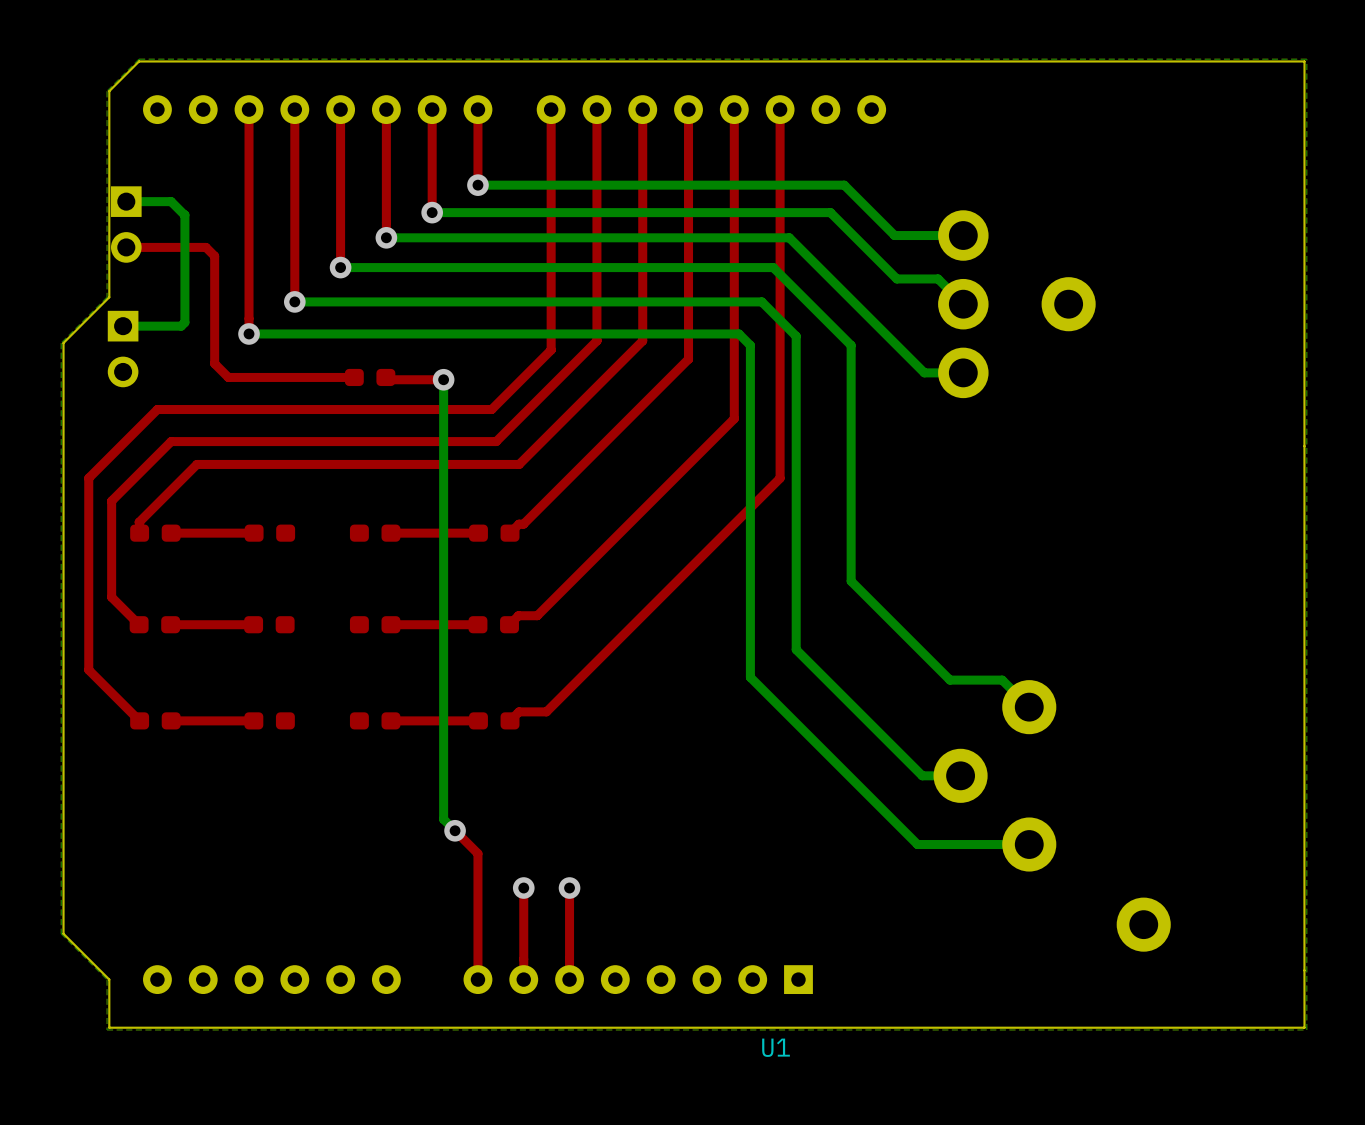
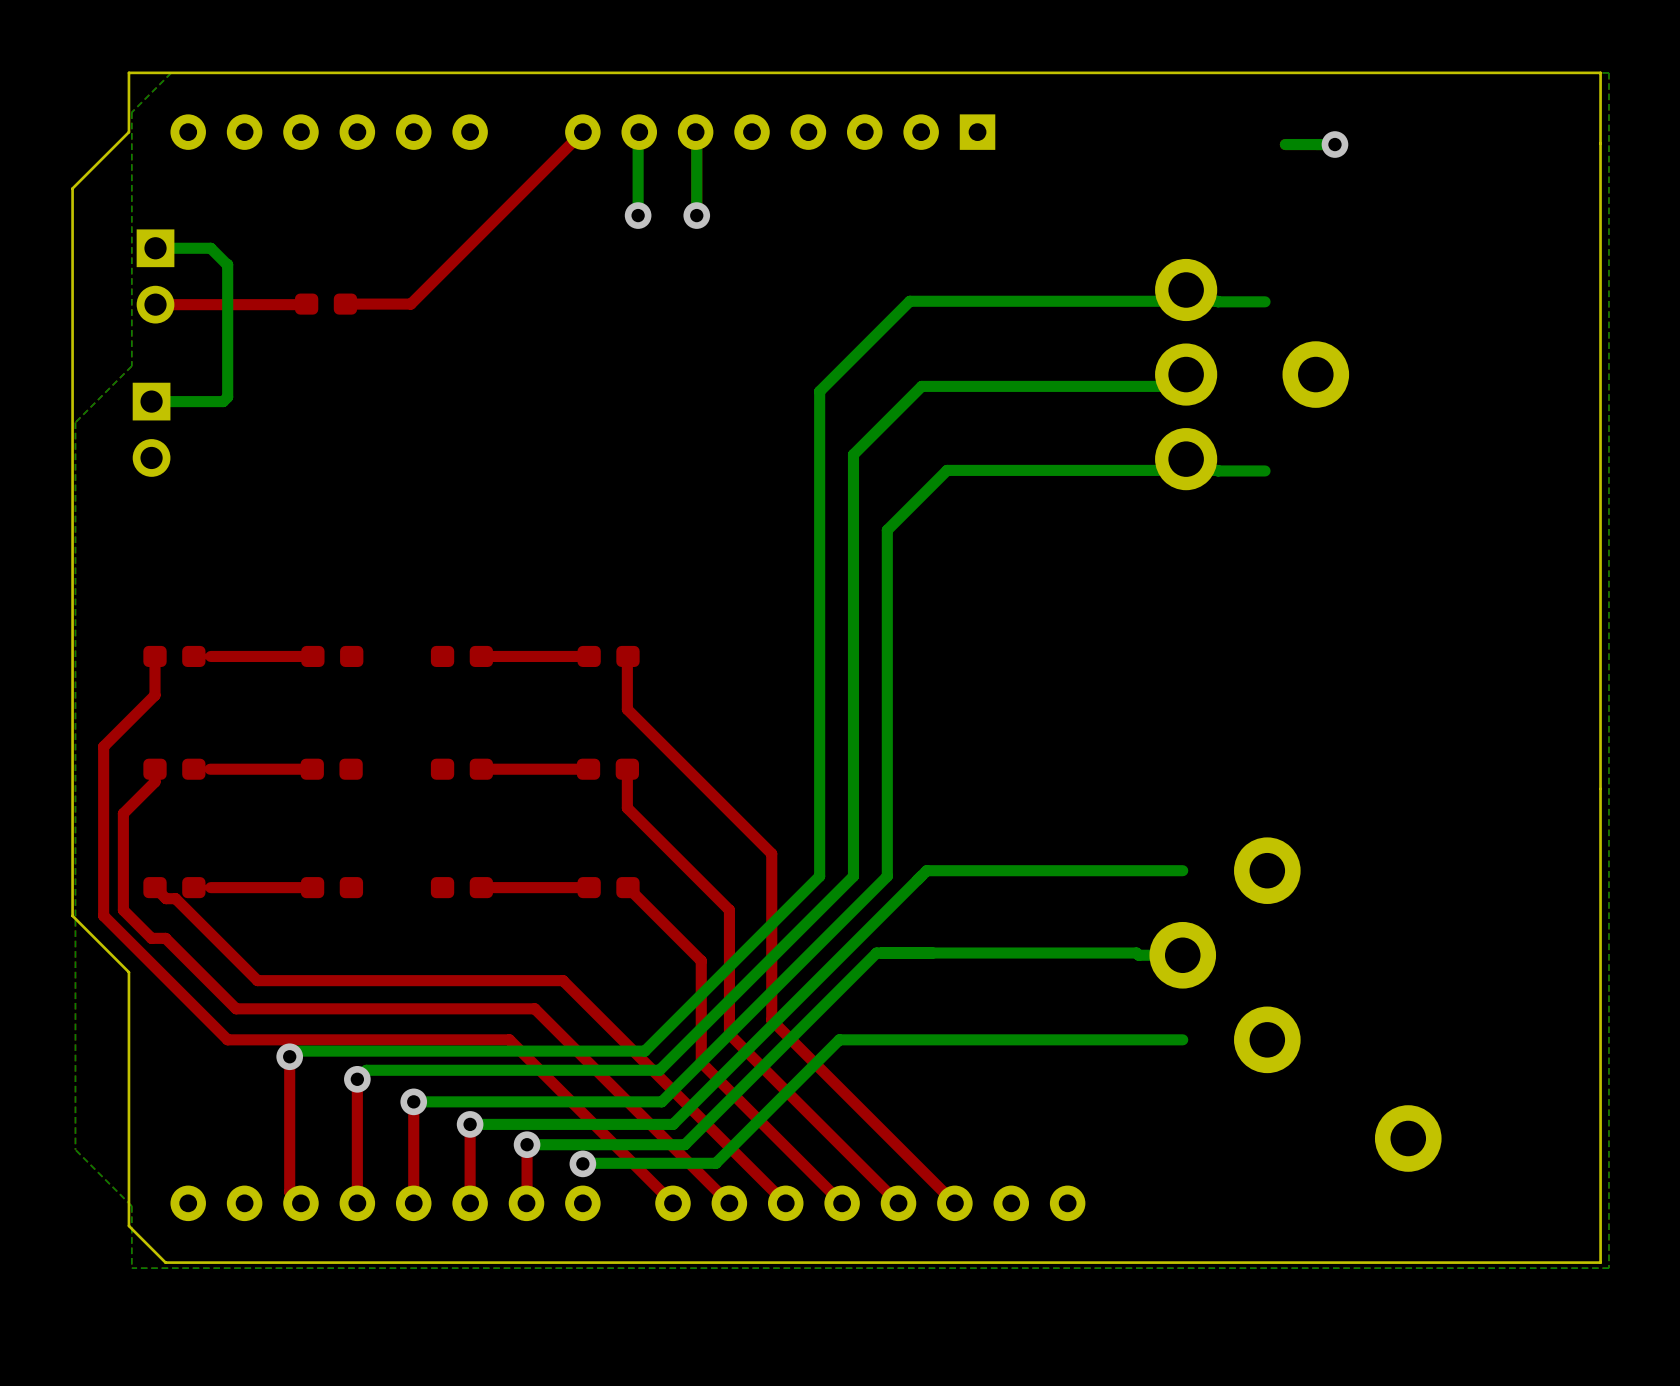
top track: none -> (582, 132) (410, 304) (345, 304)
bottom track: none -> (639, 132) (638, 215)
bottom track: none -> (695, 132) (696, 215)
top track: (249, 109) (249, 333) -> none
top track: (294, 109) (294, 301) -> none
top track: (340, 109) (340, 267) -> none
top track: (386, 109) (386, 237) -> none
top track: (432, 109) (432, 212) -> none
top track: (477, 109) (477, 185) -> none
top track: (551, 109) (551, 349) (491, 409) (157, 409) (88, 478) (88, 670) (139, 720) -> none
top track: (596, 109) (596, 340) (496, 441) (171, 441) (111, 501) (111, 597) (139, 624) -> none
top track: (642, 109) (642, 340) (519, 464) (196, 464) (139, 522) (139, 533) -> none
top track: (688, 109) (688, 359) -> none
top track: (734, 109) (734, 418) (537, 615) (518, 615) (509, 624) -> (898, 1203) (729, 1034) (729, 910) (627, 808) (627, 769)
top track: (780, 109) (780, 478) (546, 711) (519, 711) (510, 720) -> (842, 1203) (701, 1062) (701, 960) (627, 887)
bottom track: none -> (1334, 144) (1285, 144)
via: none -> (1334, 144)
via: none -> (696, 215)
bottom track: (477, 185) (844, 185) (894, 235) (963, 235) -> none
via position: (477, 185) -> (638, 215)
bottom track: (432, 212) (830, 212) (896, 278) (938, 278) (963, 304) -> none
via: (432, 212) -> none
bottom track: (386, 237) (789, 237) (924, 372) (963, 372) -> none
via: (386, 237) -> none
bottom track: none -> (1265, 301) (909, 301) (819, 391) (819, 876) (644, 1051) (295, 1051) (289, 1056)
top track: (205, 247) (214, 256) (214, 363) (228, 377) (354, 377) -> (253, 304) (306, 304)
bottom track: (340, 267) (773, 267) (851, 345) (851, 581) (950, 680) (1002, 680) (1029, 707) -> none
via: (340, 267) -> none
bottom track: (294, 301) (761, 301) (796, 336) (796, 649) (922, 775) (924, 775) -> (527, 1144) (684, 1144) (876, 953) (1136, 953) (1138, 955)
via: (294, 301) -> none
bottom track: none -> (1180, 386) (921, 386) (853, 454) (853, 876) (659, 1070) (366, 1070) (357, 1079)
bottom track: (249, 333) (738, 333) (750, 345) (750, 677) (917, 844) -> (582, 1163) (715, 1163) (839, 1039) (1129, 1039)
via: (249, 333) -> none
top track: (688, 359) (523, 524) (519, 524) (510, 533) -> (954, 1203) (771, 1020) (771, 853) (627, 709) (627, 656)
part position: (370, 377) -> (326, 304)
top track: (385, 377) (388, 379) (443, 379) -> none
bottom track: (443, 379) (443, 819) (455, 830) -> none
via: (443, 379) -> none
bottom track: none -> (1265, 470) (947, 470) (887, 530) (887, 876) (661, 1101) (413, 1101)
top track: none -> (155, 656) (155, 695) (103, 746) (103, 915) (227, 1039) (509, 1039) (672, 1203)
part position: (155, 533) -> (174, 656)
U1 side: bottom (684, 544) -> top (836, 667)
top track: none -> (155, 769) (155, 781) (123, 813) (123, 910) (151, 938) (165, 938) (236, 1008) (534, 1008) (729, 1203)
part position: (154, 624) -> (174, 769)
bottom track: none -> (1182, 870) (926, 870) (673, 1124) (470, 1124)
top track: none -> (155, 887) (166, 898) (175, 898) (257, 980) (563, 980) (785, 1203)
part position: (155, 720) -> (174, 887)
top track: (455, 830) (477, 853) (477, 979) -> none
via: (455, 830) -> none
bottom track: (1029, 844) (960, 844) -> none
top track: none -> (289, 1056) (289, 1192) (300, 1203)
via: none -> (289, 1056)
top track: none -> (357, 1079) (357, 1203)
via: none -> (357, 1079)
top track: (523, 888) (523, 979) -> none
via: (523, 888) -> none
top track: (569, 888) (569, 979) -> none
via: (569, 888) -> none
top track: none -> (413, 1101) (413, 1203)
via: none -> (413, 1101)
top track: none -> (470, 1124) (470, 1203)
via: none -> (470, 1124)
top track: none -> (527, 1144) (527, 1201)
via: none -> (527, 1144)
via: none -> (582, 1163)

